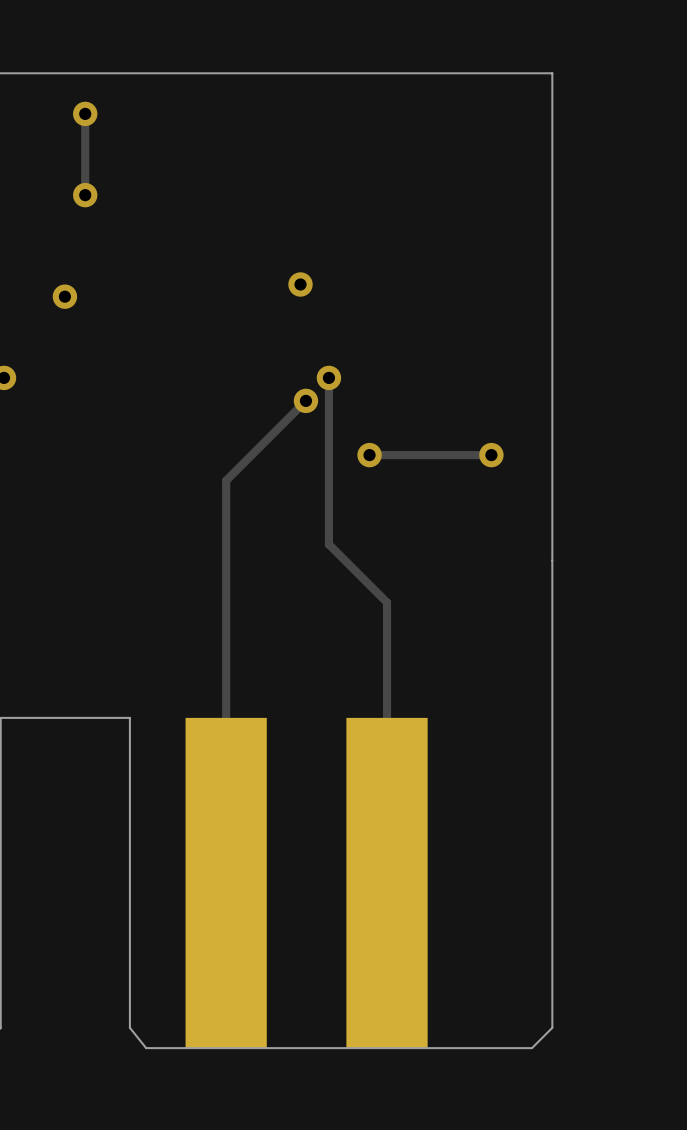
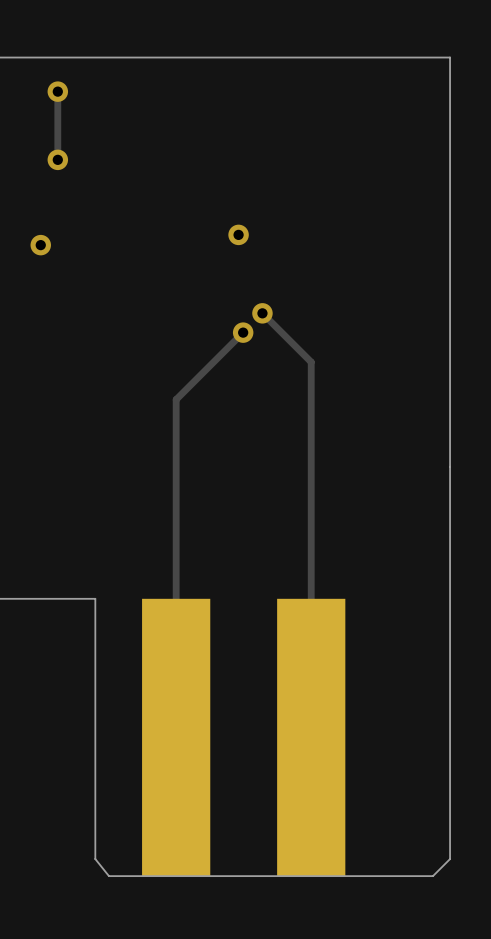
track: (328, 377) (328, 544) (387, 602) -> (262, 313) (311, 362) (311, 501)
via: (369, 455) -> none
track: (491, 455) (369, 455) -> none
via: (491, 455) -> none

